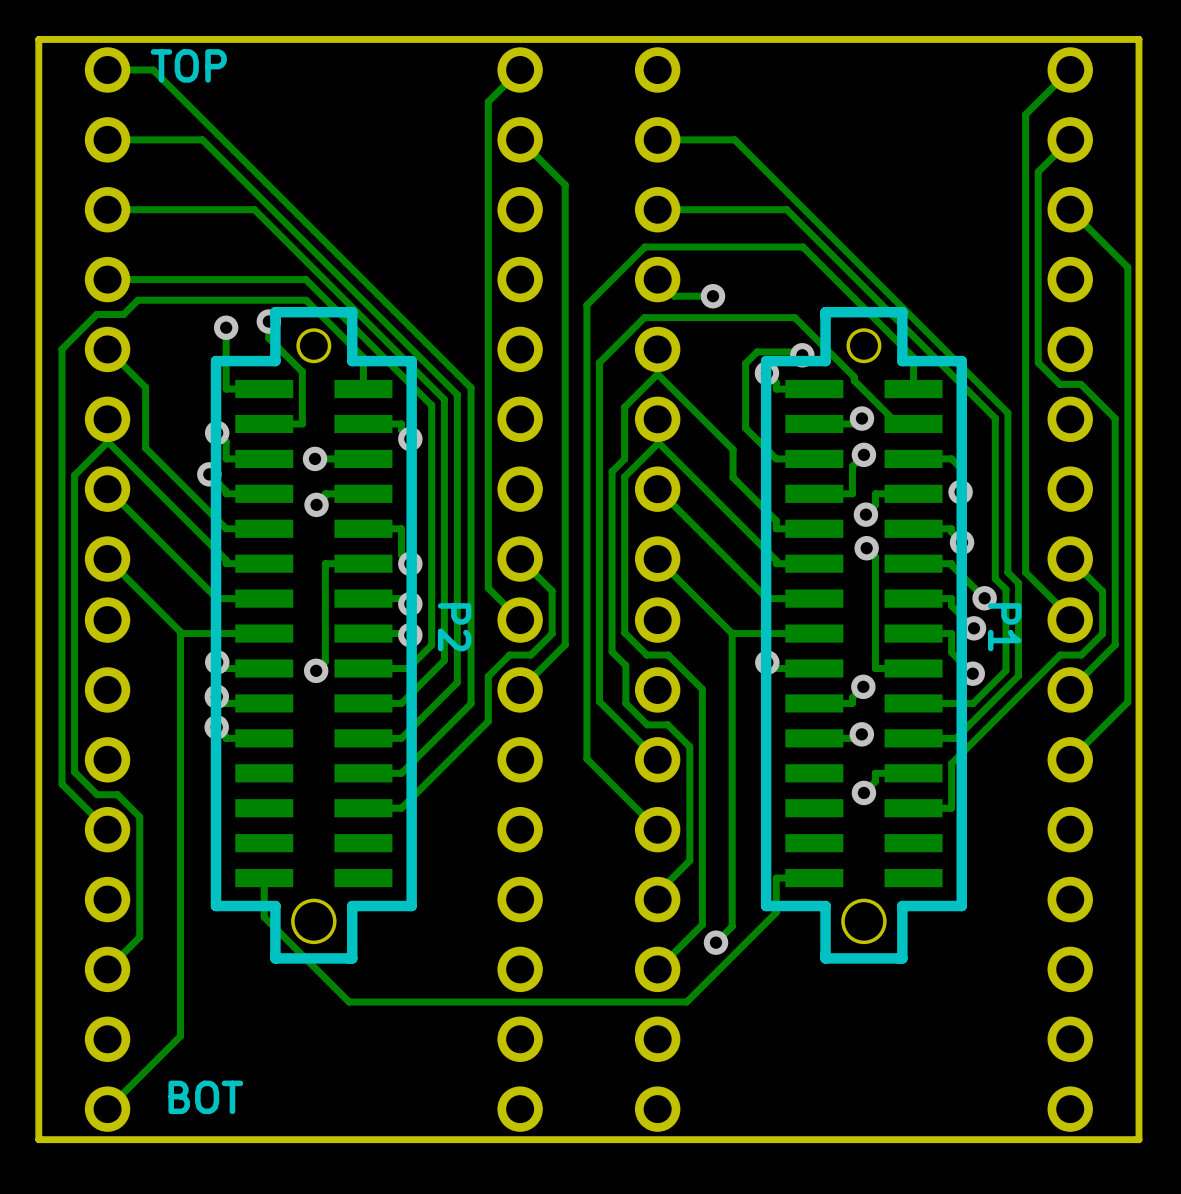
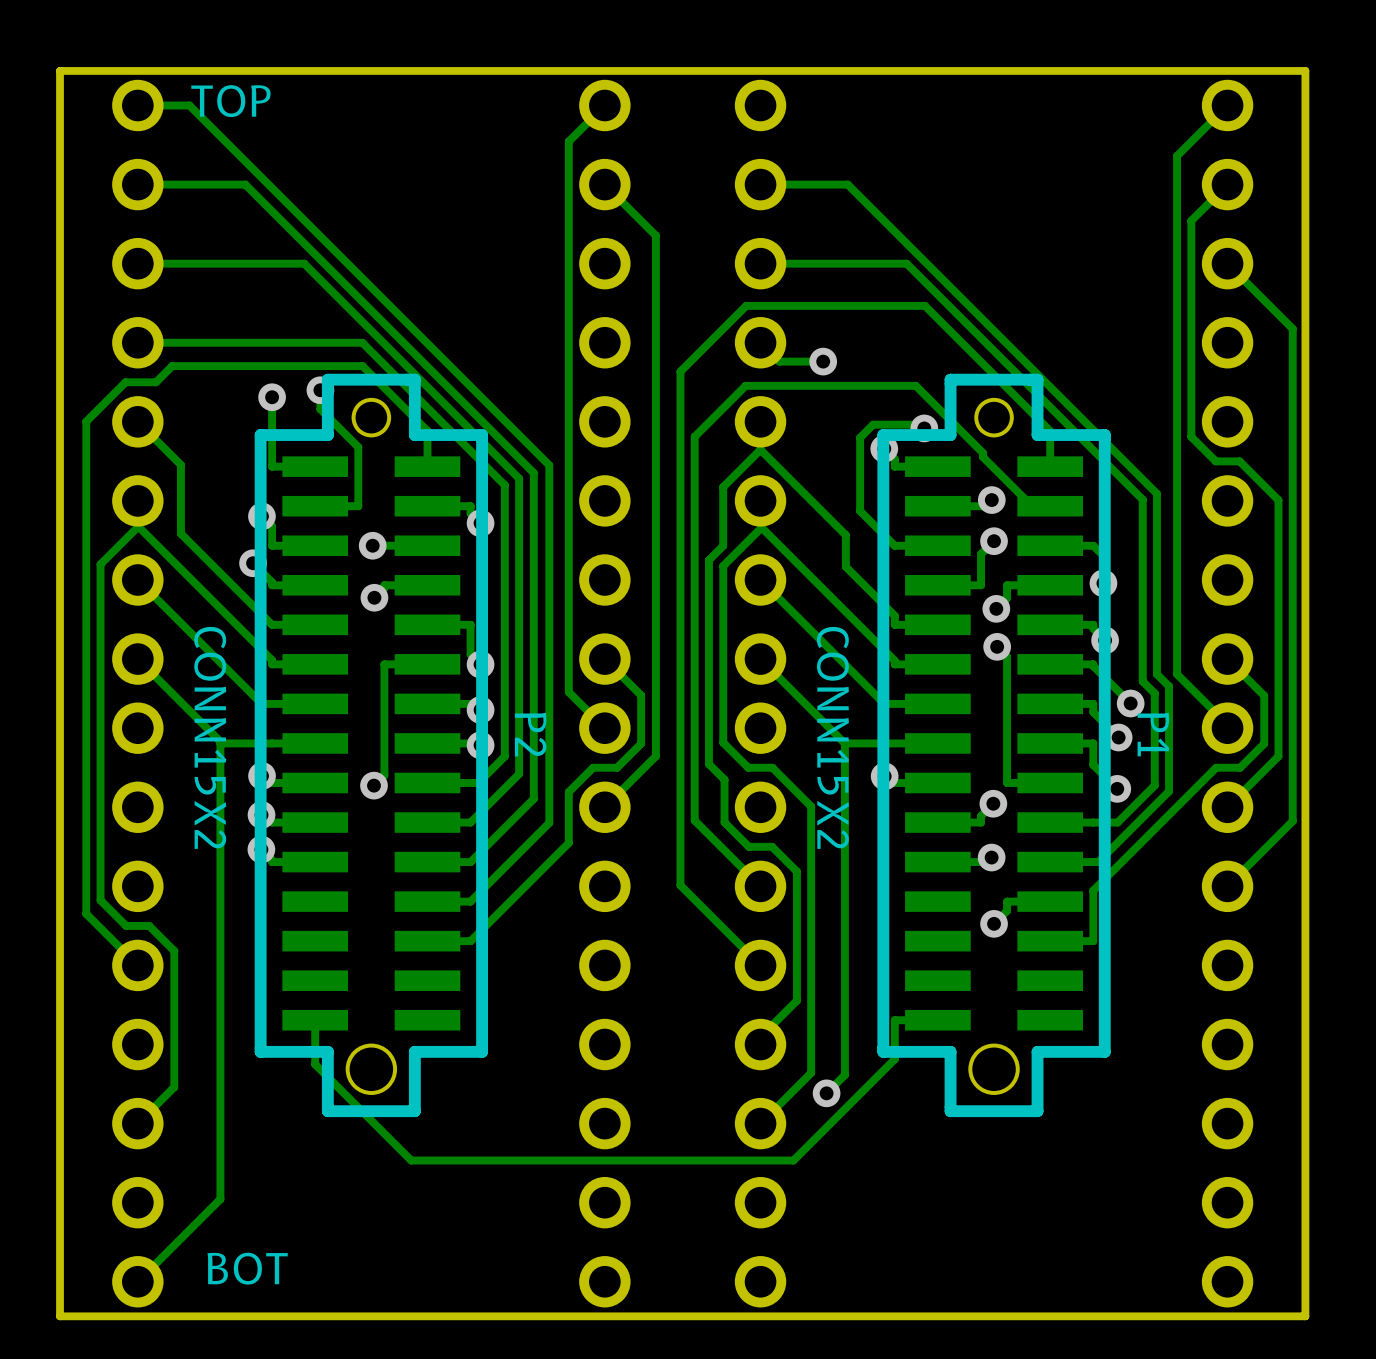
P2 value: none -> CONN15X2 (210, 737)
P1 value: none -> CONN15X2 (832, 737)

